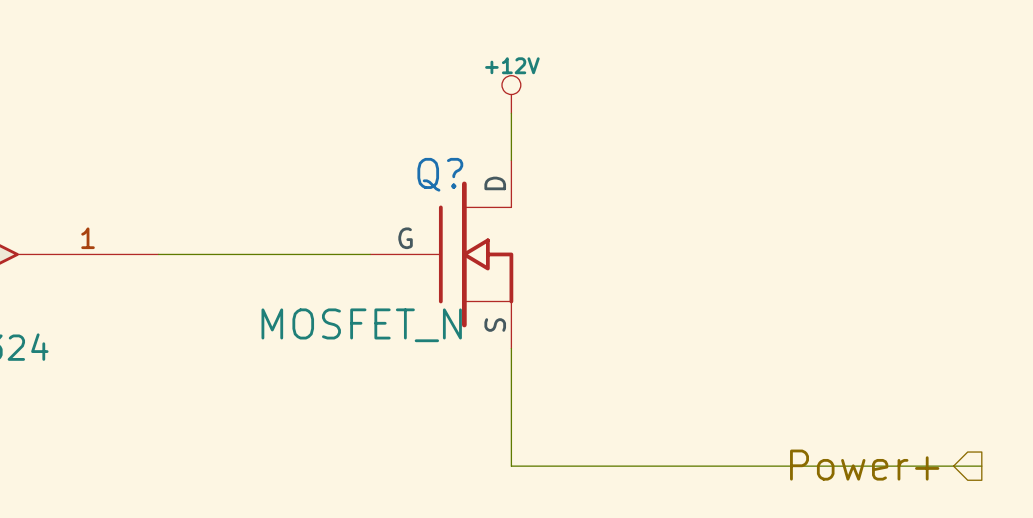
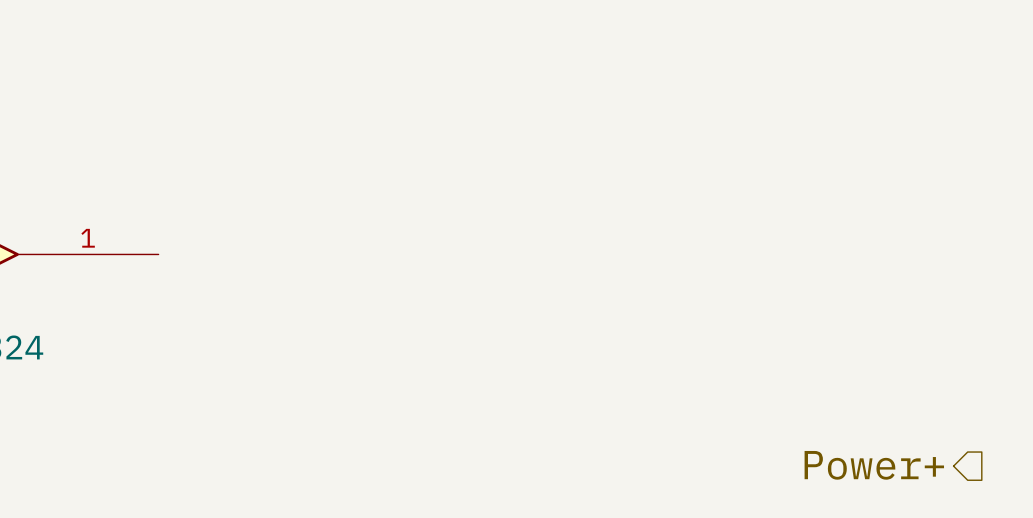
power symbol: +12V (511, 94) -> none
wire: (511, 113) (511, 160) -> none
wire: (158, 254) (370, 254) -> none
Q?: MOSFET_N (441, 254) -> none
wire: (511, 348) (511, 466) (981, 466) -> none

